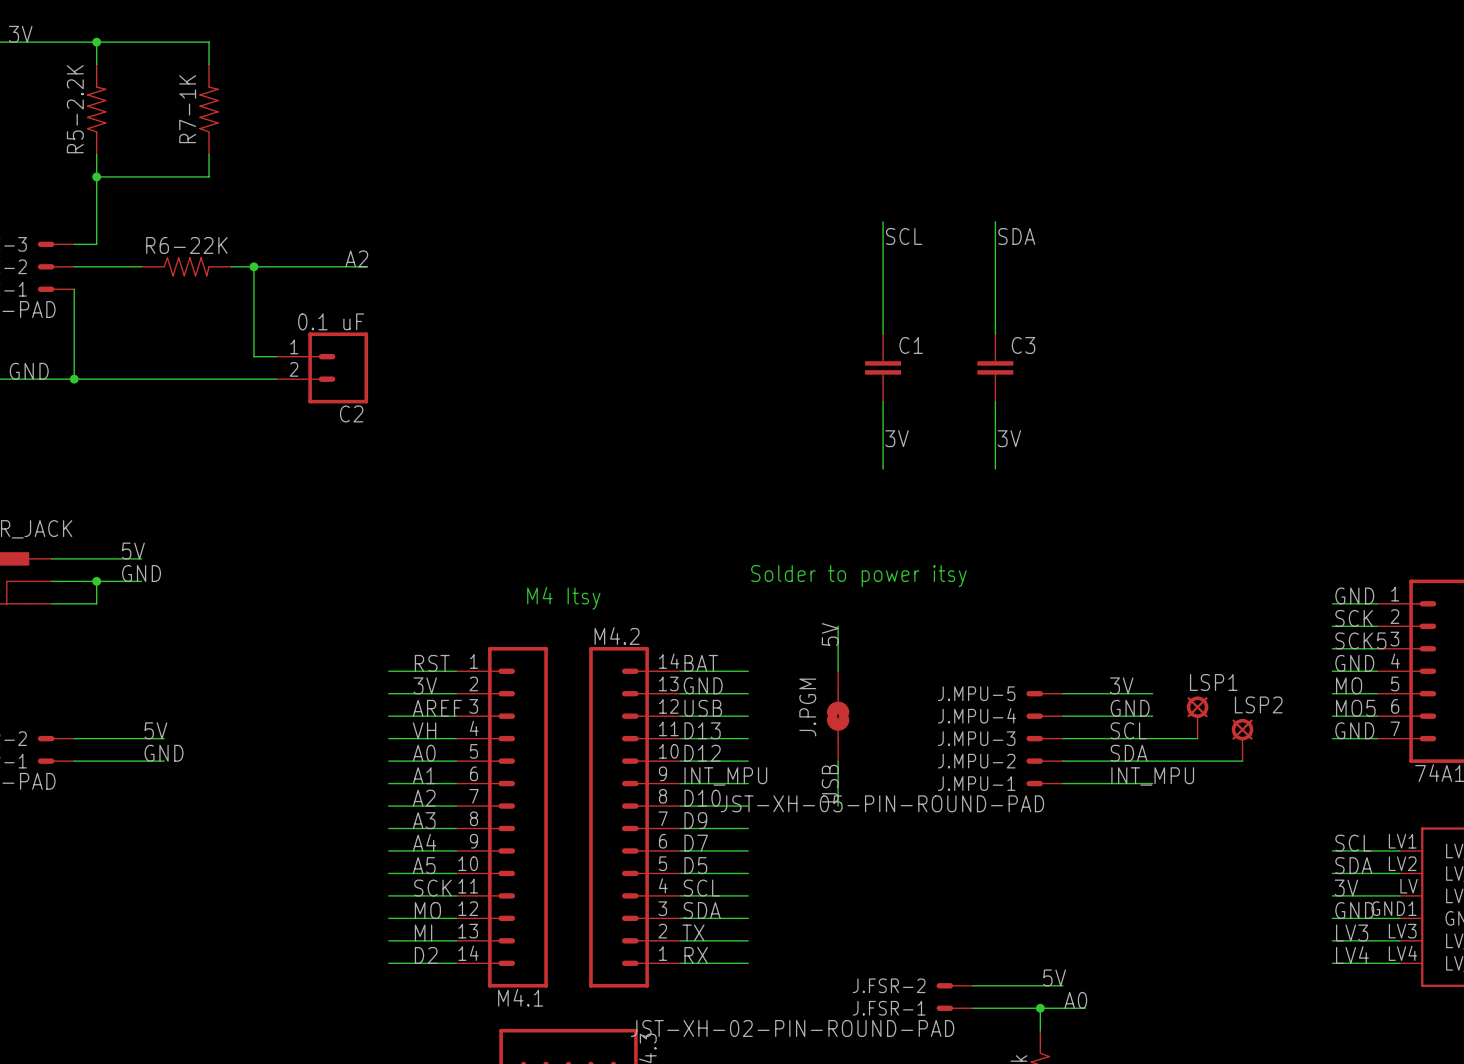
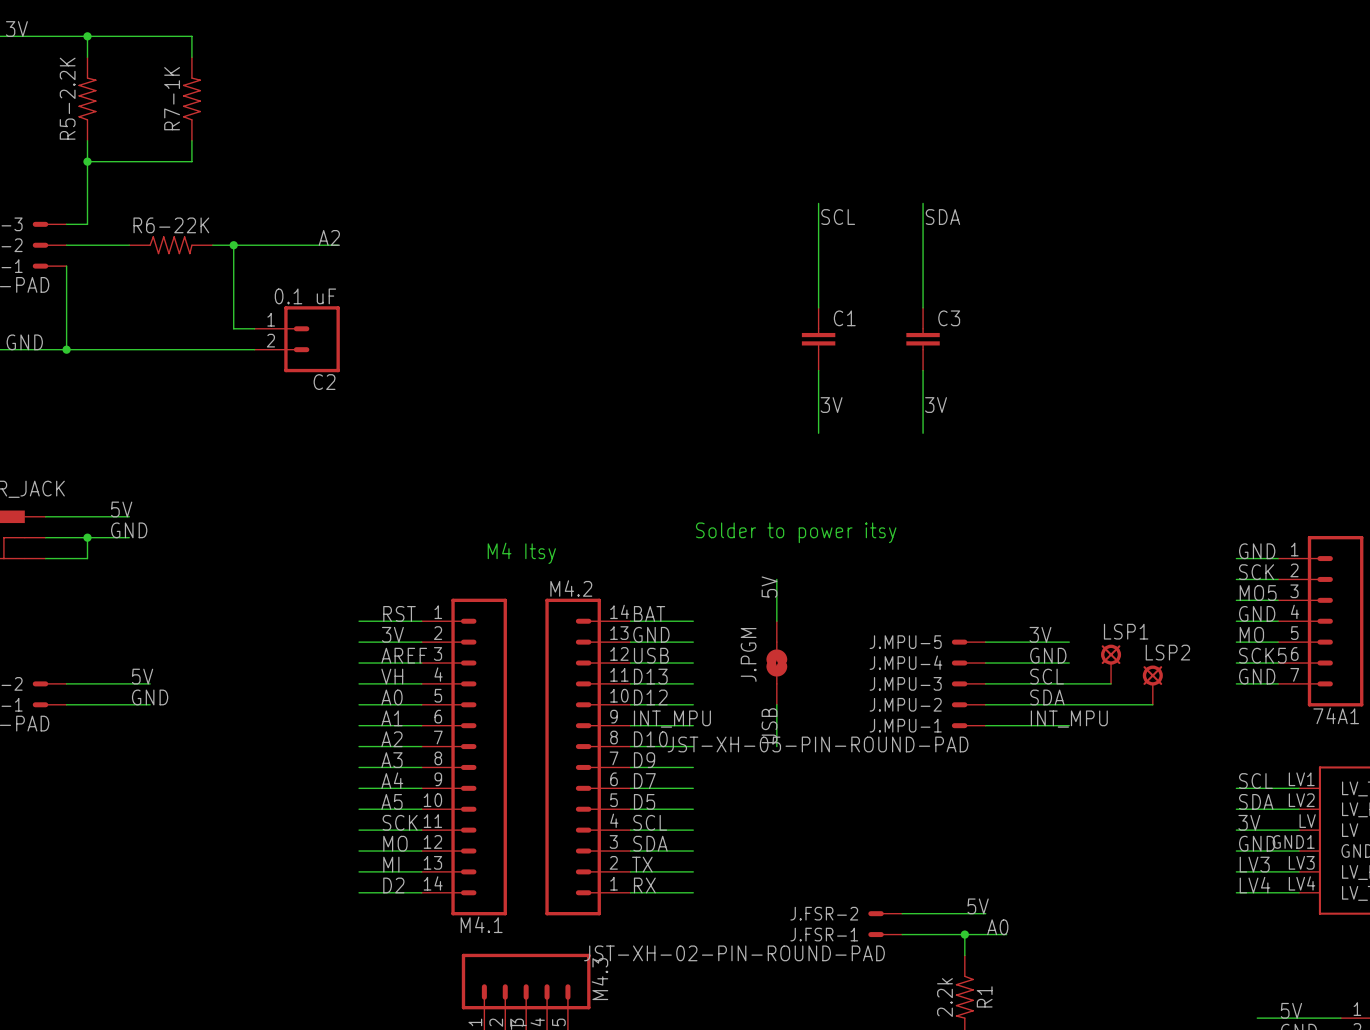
label: SCK5 (1360, 640) -> MO5 (1258, 593)
label: MO5 (1355, 708) -> SCK5 (1262, 655)

